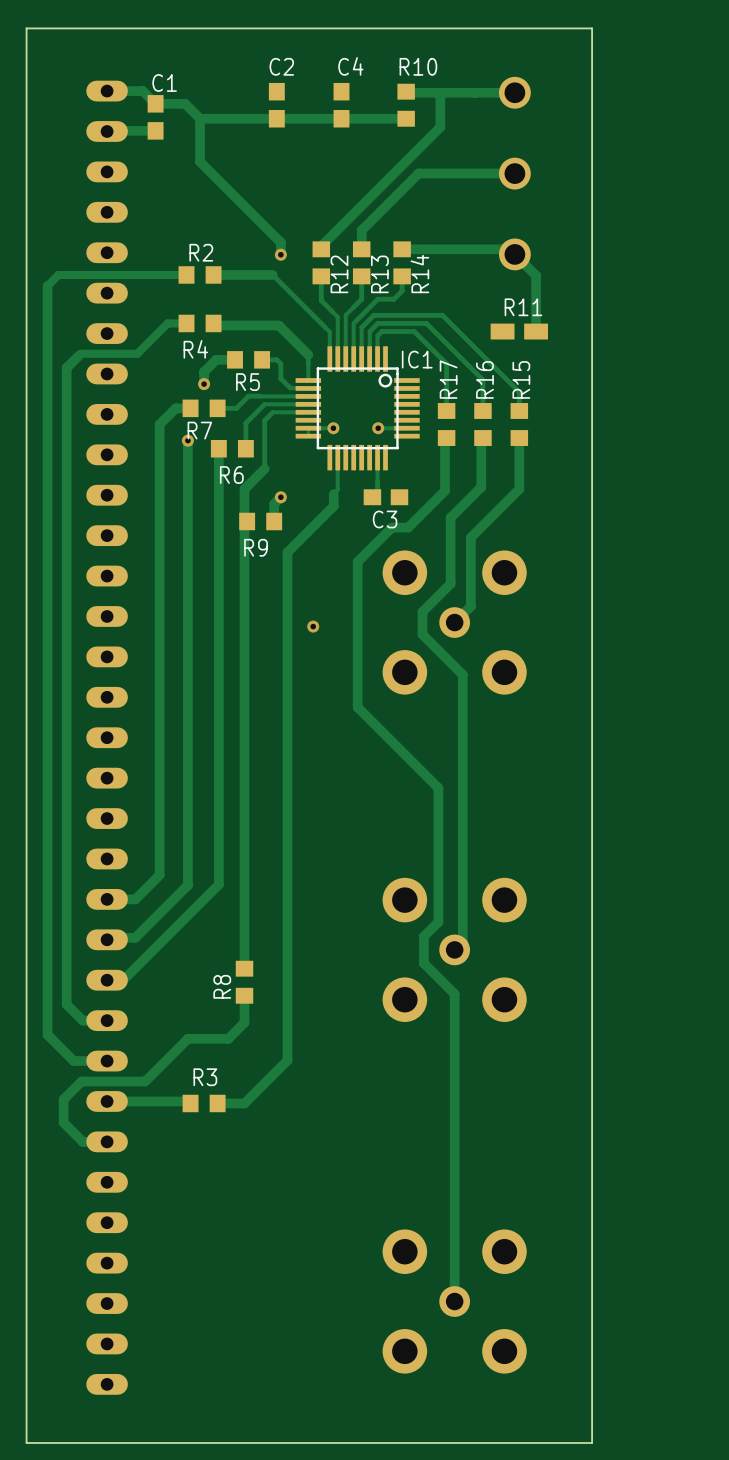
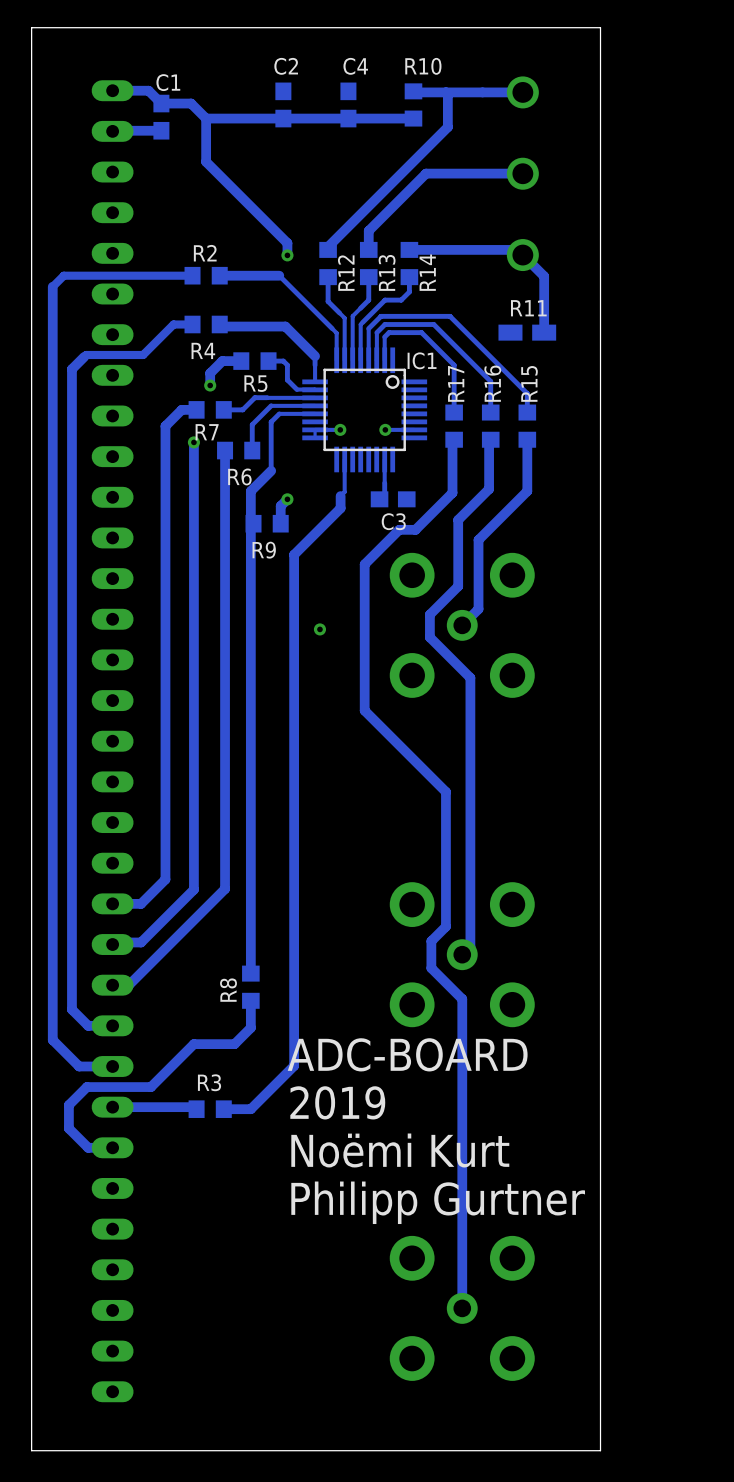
text: none -> ADC-BOARD (407, 1054)
text: none -> 2019 (337, 1102)
text: none -> Noëmi Kurt (400, 1150)
text: none -> Philipp Gurtner (438, 1202)

